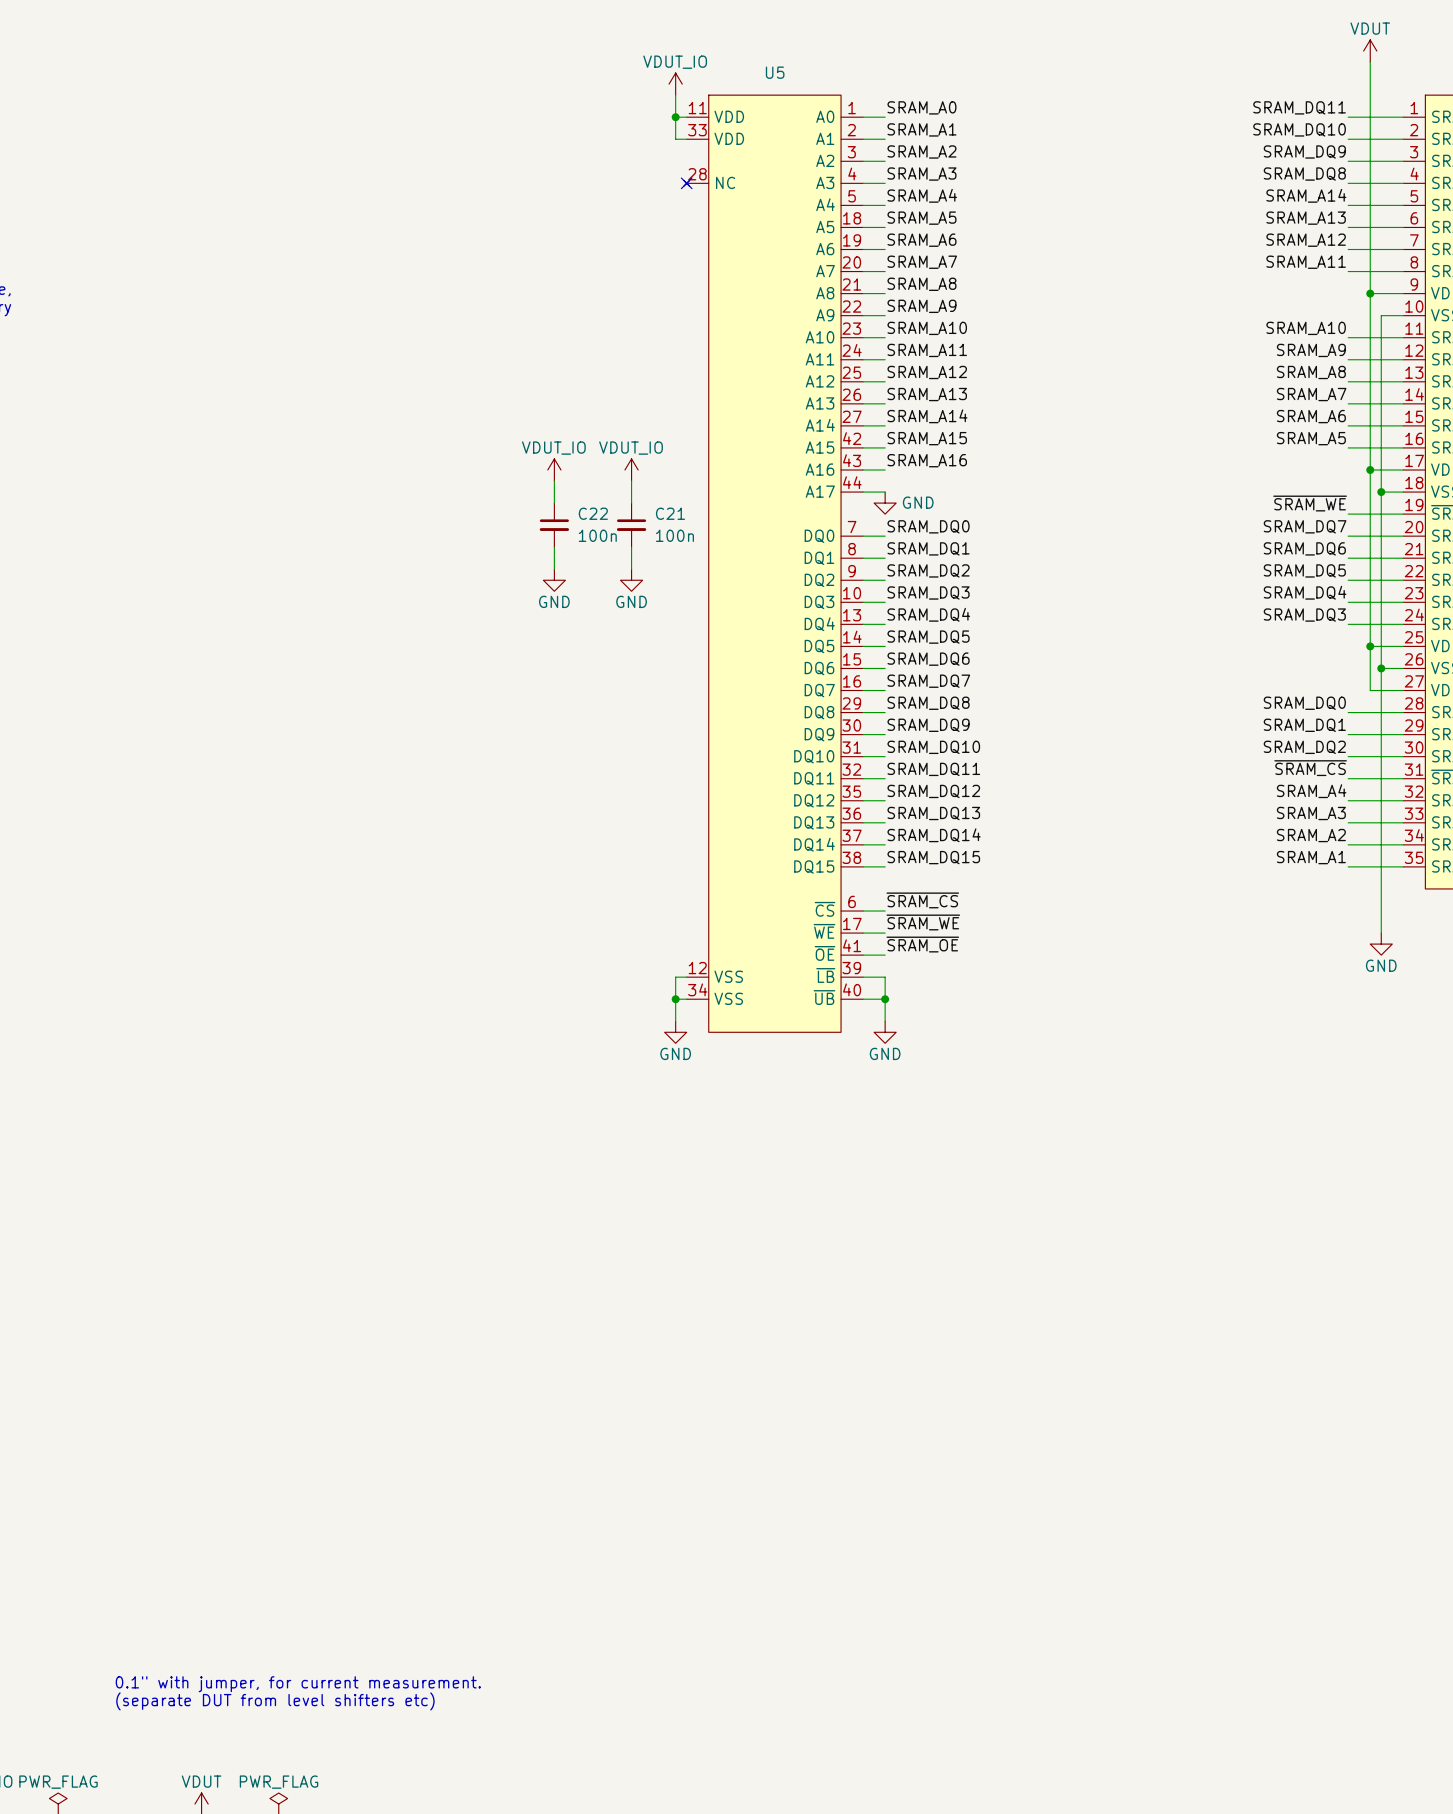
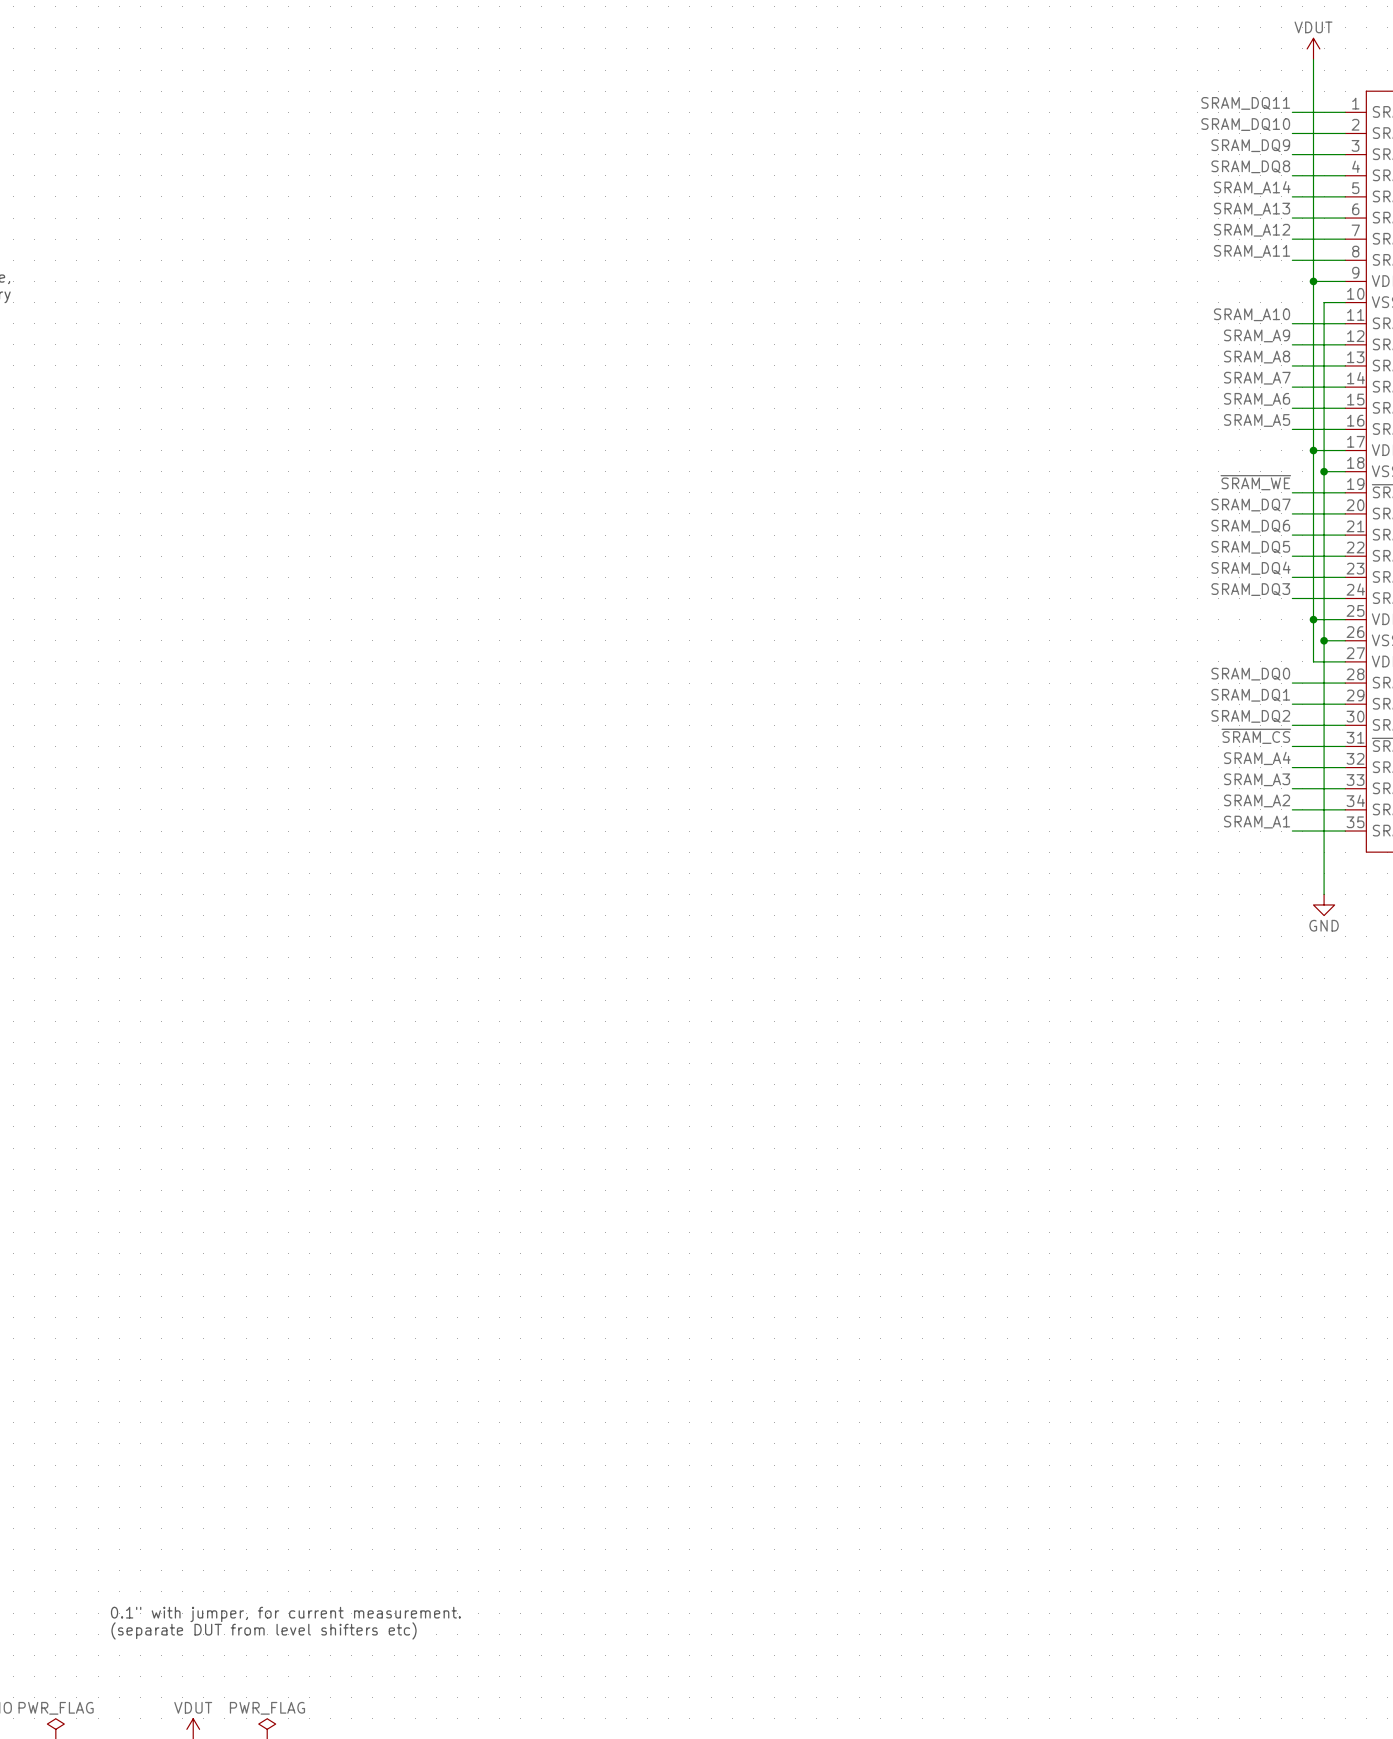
power symbol: VDUT_IO (675, 84) -> none
wire: (675, 95) (675, 139) (686, 139) -> none
label: SRAM_A0 (921, 107) -> none
wire: (675, 117) (686, 117) -> none
junction: (675, 117) -> none
wire: (863, 117) (885, 117) -> none
label: SRAM_A1 (921, 129) -> none
wire: (863, 139) (885, 139) -> none
label: SRAM_A2 (921, 151) -> none
wire: (863, 161) (885, 161) -> none
label: SRAM_A3 (921, 174) -> none
no-connect mark: (686, 183) -> none
wire: (863, 183) (885, 183) -> none
label: SRAM_A4 (922, 195) -> none
wire: (863, 205) (885, 205) -> none
label: SRAM_A5 (921, 218) -> none
wire: (863, 227) (885, 227) -> none
label: SRAM_A6 (921, 240) -> none
wire: (863, 249) (885, 249) -> none
label: SRAM_A7 (922, 262) -> none
wire: (863, 271) (885, 271) -> none
label: SRAM_A8 (921, 284) -> none
wire: (863, 293) (885, 293) -> none
label: SRAM_A9 (921, 306) -> none
wire: (863, 315) (885, 315) -> none
label: SRAM_A10 (927, 328) -> none
wire: (863, 337) (885, 337) -> none
label: SRAM_A11 (927, 350) -> none
wire: (863, 359) (885, 359) -> none
label: SRAM_A12 (927, 372) -> none
wire: (863, 381) (885, 381) -> none
label: SRAM_A13 (927, 394) -> none
wire: (863, 403) (885, 403) -> none
label: SRAM_A14 (927, 416) -> none
wire: (863, 425) (885, 425) -> none
label: SRAM_A15 (927, 438) -> none
wire: (863, 447) (885, 447) -> none
label: SRAM_A16 (927, 460) -> none
power symbol: VDUT_IO (554, 470) -> none
power symbol: VDUT_IO (631, 470) -> none
wire: (863, 470) (885, 470) -> none
wire: (554, 481) (554, 503) -> none
wire: (631, 481) (631, 503) -> none
wire: (863, 492) (885, 492) -> none
power symbol: GND (885, 503) -> none
C22: 100n (554, 525) -> none
C21: 100n (631, 525) -> none
label: SRAM_DQ0 (928, 526) -> none
wire: (863, 536) (885, 536) -> none
wire: (554, 547) (554, 569) -> none
wire: (631, 547) (631, 569) -> none
label: SRAM_DQ1 (928, 548) -> none
wire: (863, 558) (885, 558) -> none
U5: (773, 563) -> none
label: SRAM_DQ2 (928, 570) -> none
power symbol: GND (554, 580) -> none
power symbol: GND (631, 580) -> none
wire: (863, 580) (885, 580) -> none
label: SRAM_DQ3 (928, 592) -> none
wire: (863, 602) (885, 602) -> none
label: SRAM_DQ4 (928, 614) -> none
wire: (863, 624) (885, 624) -> none
label: SRAM_DQ5 (928, 637) -> none
wire: (863, 646) (885, 646) -> none
label: SRAM_DQ6 (928, 659) -> none
wire: (863, 668) (885, 668) -> none
label: SRAM_DQ7 (928, 681) -> none
wire: (863, 690) (885, 690) -> none
label: SRAM_DQ8 (928, 703) -> none
wire: (863, 712) (885, 712) -> none
label: SRAM_DQ9 (928, 725) -> none
wire: (863, 734) (885, 734) -> none
label: SRAM_DQ10 (933, 747) -> none
wire: (863, 756) (885, 756) -> none
label: SRAM_DQ11 (933, 769) -> none
wire: (863, 778) (885, 778) -> none
label: SRAM_DQ12 (933, 791) -> none
wire: (863, 800) (885, 800) -> none
label: SRAM_DQ13 (933, 813) -> none
wire: (863, 822) (885, 822) -> none
label: SRAM_DQ14 (934, 835) -> none
wire: (863, 844) (885, 844) -> none
label: SRAM_DQ15 (933, 857) -> none
wire: (863, 866) (885, 866) -> none
label: ~{SRAM_CS} (922, 900) -> none
wire: (863, 911) (885, 911) -> none
label: ~{SRAM_WE} (923, 922) -> none
wire: (863, 933) (885, 933) -> none
label: ~{SRAM_OE} (922, 944) -> none
wire: (863, 955) (885, 955) -> none
wire: (686, 977) (675, 977) (675, 1021) -> none
wire: (863, 977) (885, 977) (885, 1021) -> none
wire: (675, 999) (686, 999) -> none
junction: (675, 999) -> none
wire: (863, 999) (885, 999) -> none
junction: (885, 999) -> none
power symbol: GND (675, 1032) -> none
power symbol: GND (885, 1032) -> none

